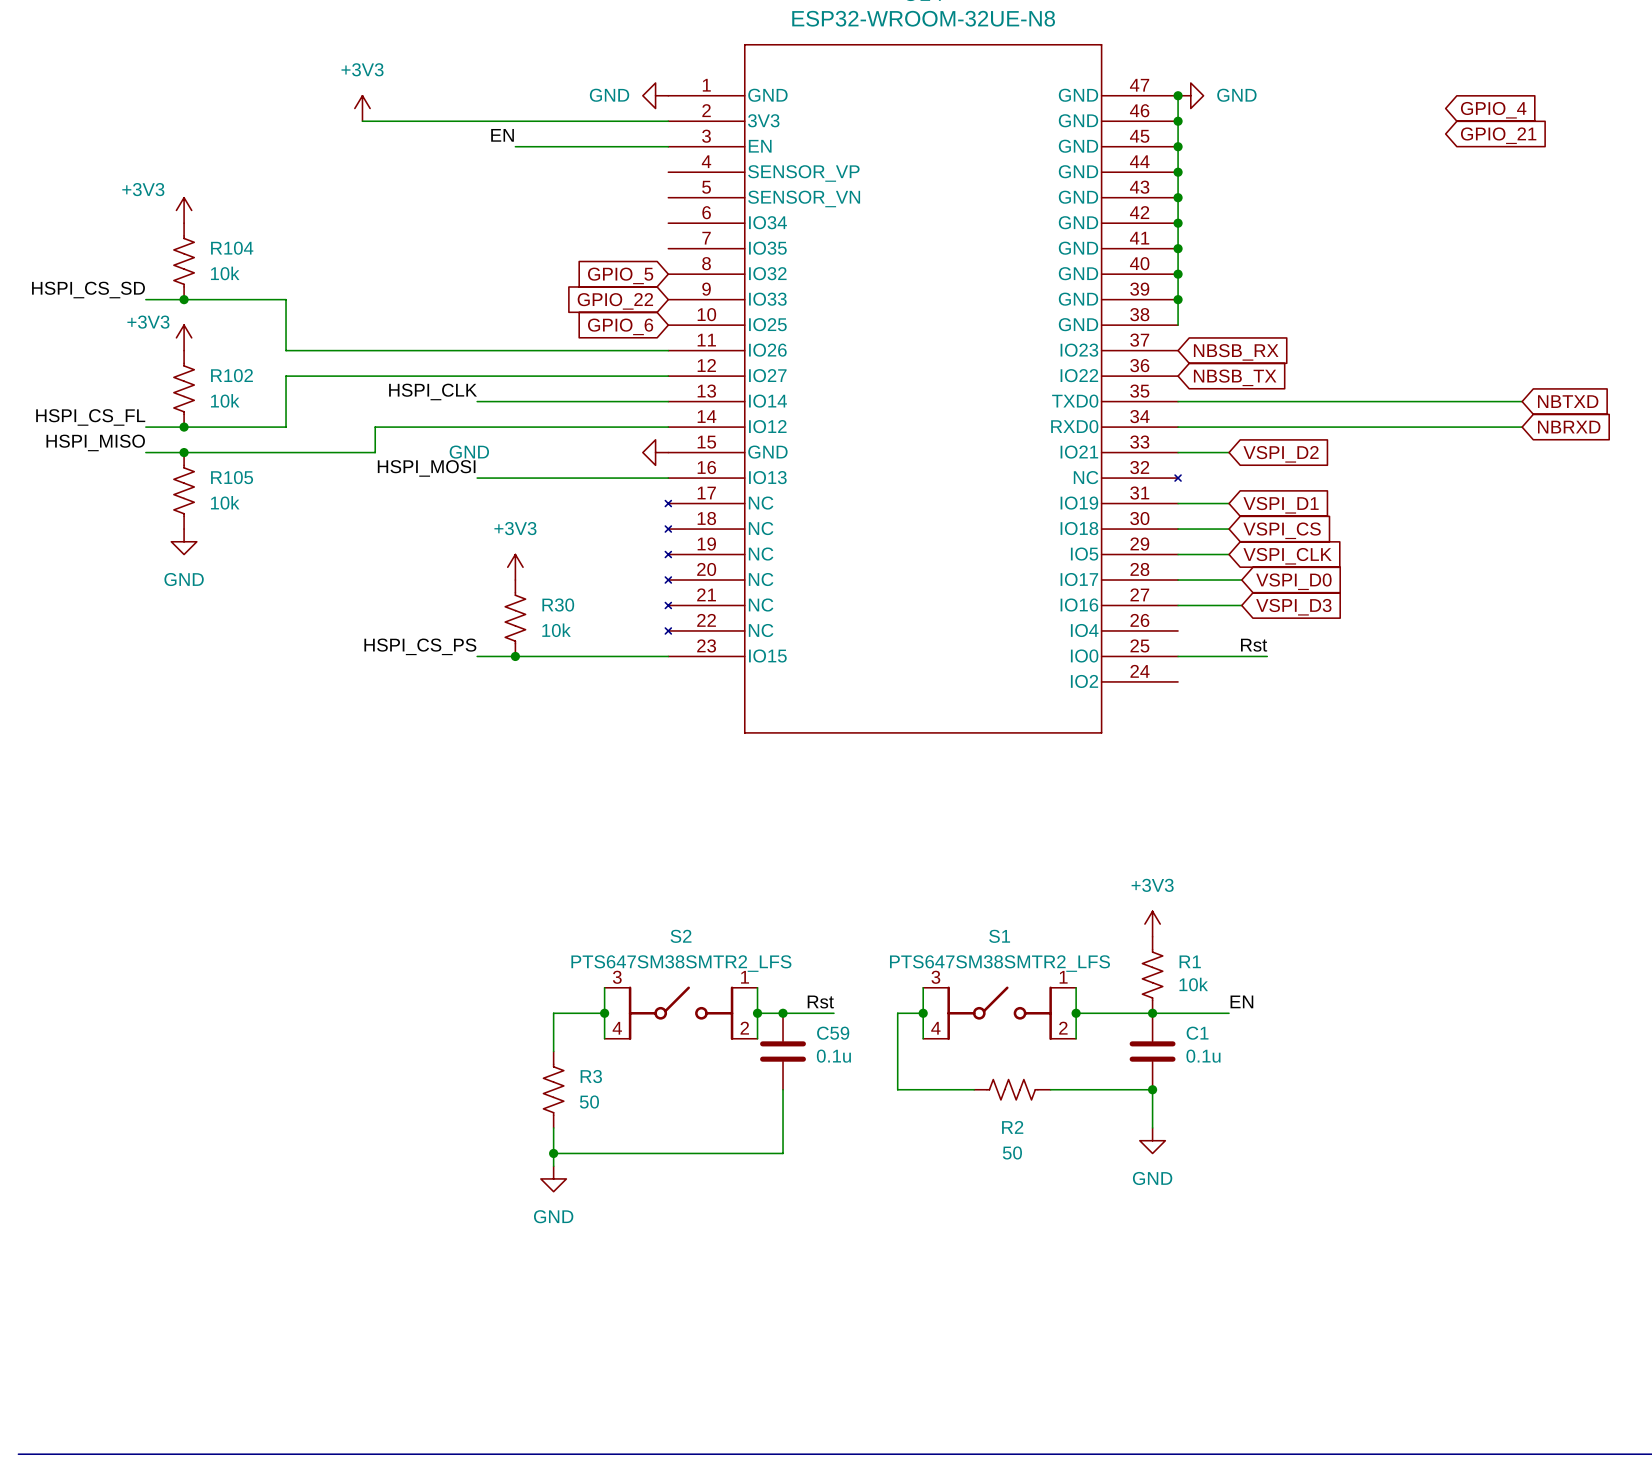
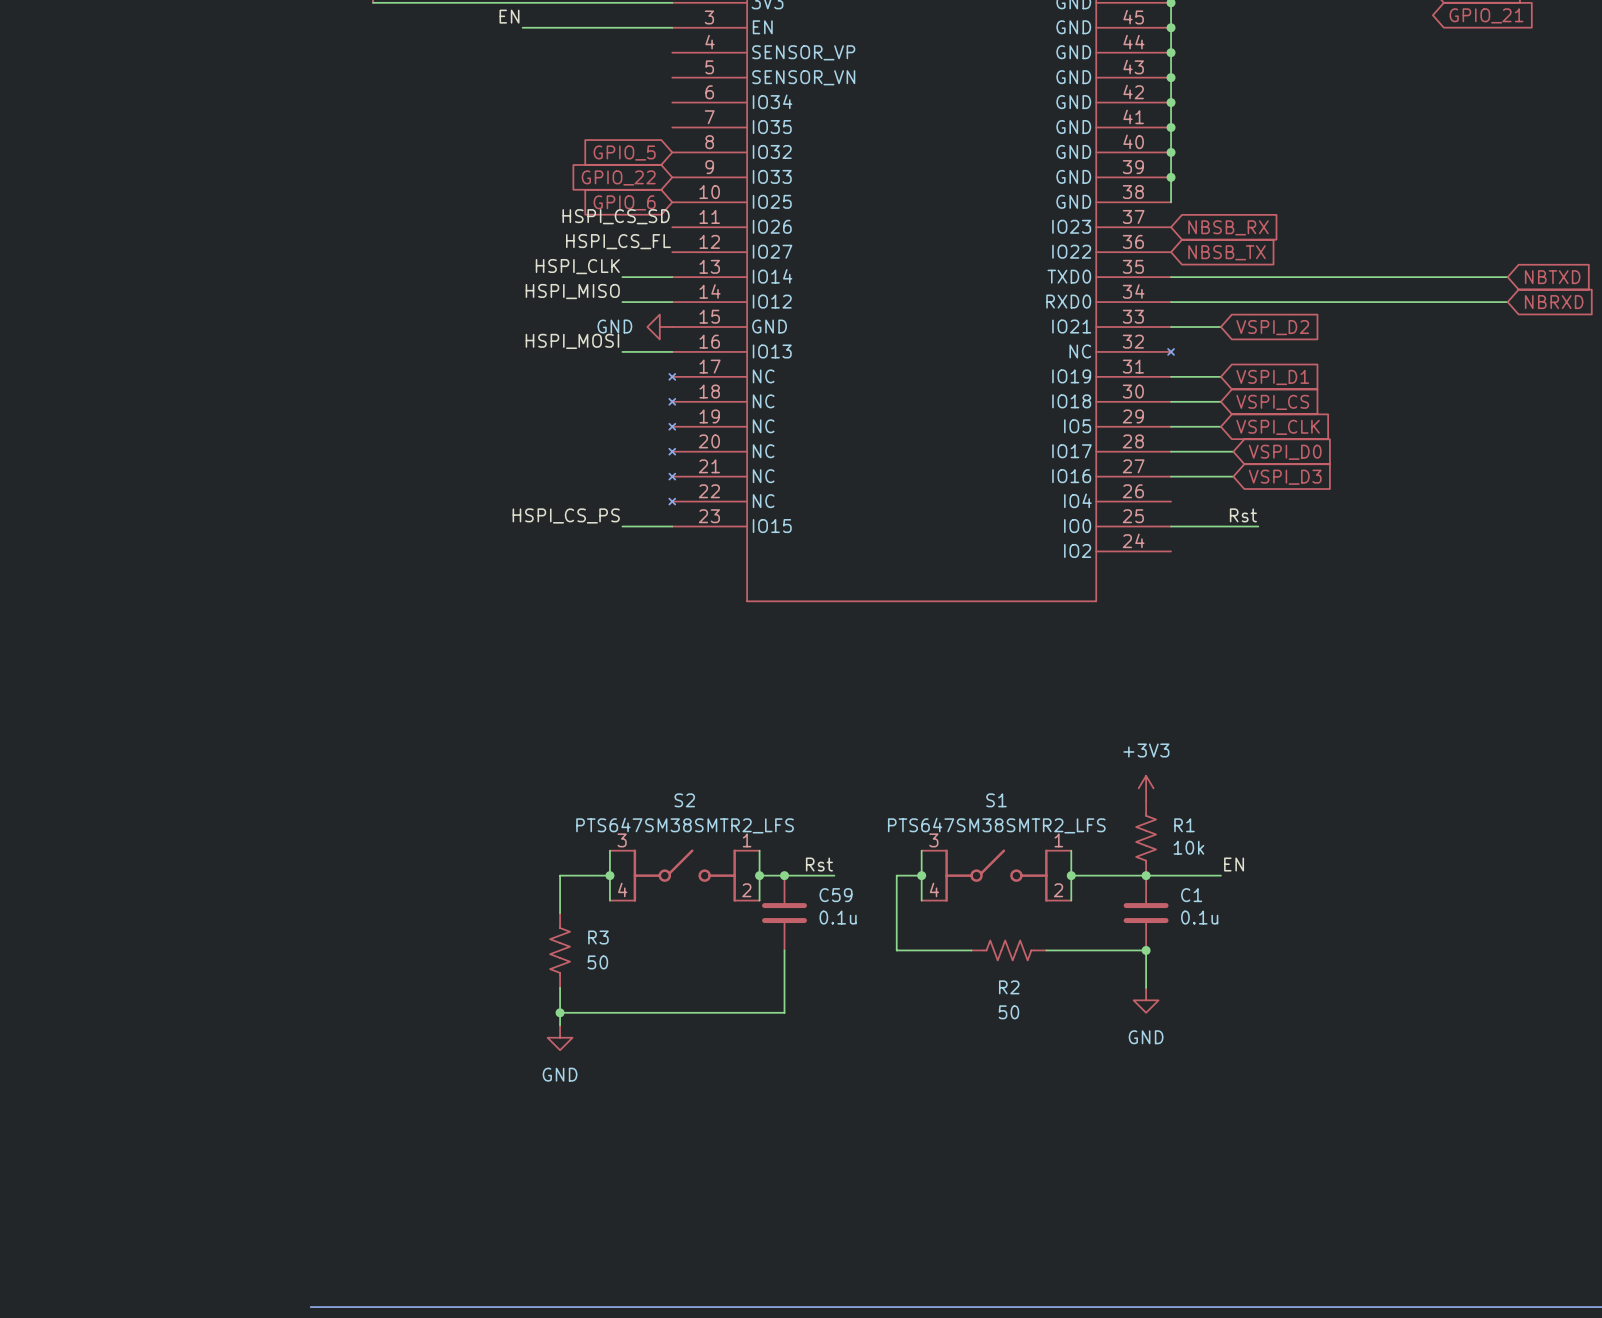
power symbol: +3V3 (184, 210) -> none
R104: 10k (184, 261) -> none
label: HSPI_CS_SD (88, 290) -> none
wire: (145, 299) (286, 299) (286, 350) (668, 350) -> none
junction: (184, 299) -> none
power symbol: +3V3 (184, 337) -> none
label: none -> HSPI_CS_SD (616, 216)
label: none -> HSPI_CS_FL (618, 241)
wire: (668, 376) (286, 376) (286, 427) (145, 427) -> none
R102: 10k (184, 388) -> none
label position: HSPI_CLK (433, 391) -> HSPI_CLK (577, 266)
wire: (477, 401) (617, 401) -> none
label: HSPI_CS_FL (90, 417) -> none
label: none -> HSPI_MISO (572, 291)
junction: (184, 427) -> none
wire: (617, 427) (375, 427) (375, 452) (145, 452) -> none
label: HSPI_MISO (95, 442) -> none
junction: (184, 452) -> none
power symbol text position: GND (469, 452) -> GND (614, 326)
label position: HSPI_MOSI (426, 468) -> HSPI_MOSI (572, 341)
wire: (477, 478) (617, 478) -> none
R105: 10k (184, 490) -> none
power symbol: GND (184, 541) -> none
power symbol: +3V3 (515, 567) -> none
R30: 10k (515, 618) -> none
label position: HSPI_CS_PS (420, 646) -> HSPI_CS_PS (566, 515)
wire: (477, 656) (617, 656) -> none
junction: (515, 656) -> none
line: (18, 1454) (298, 1454) -> none

